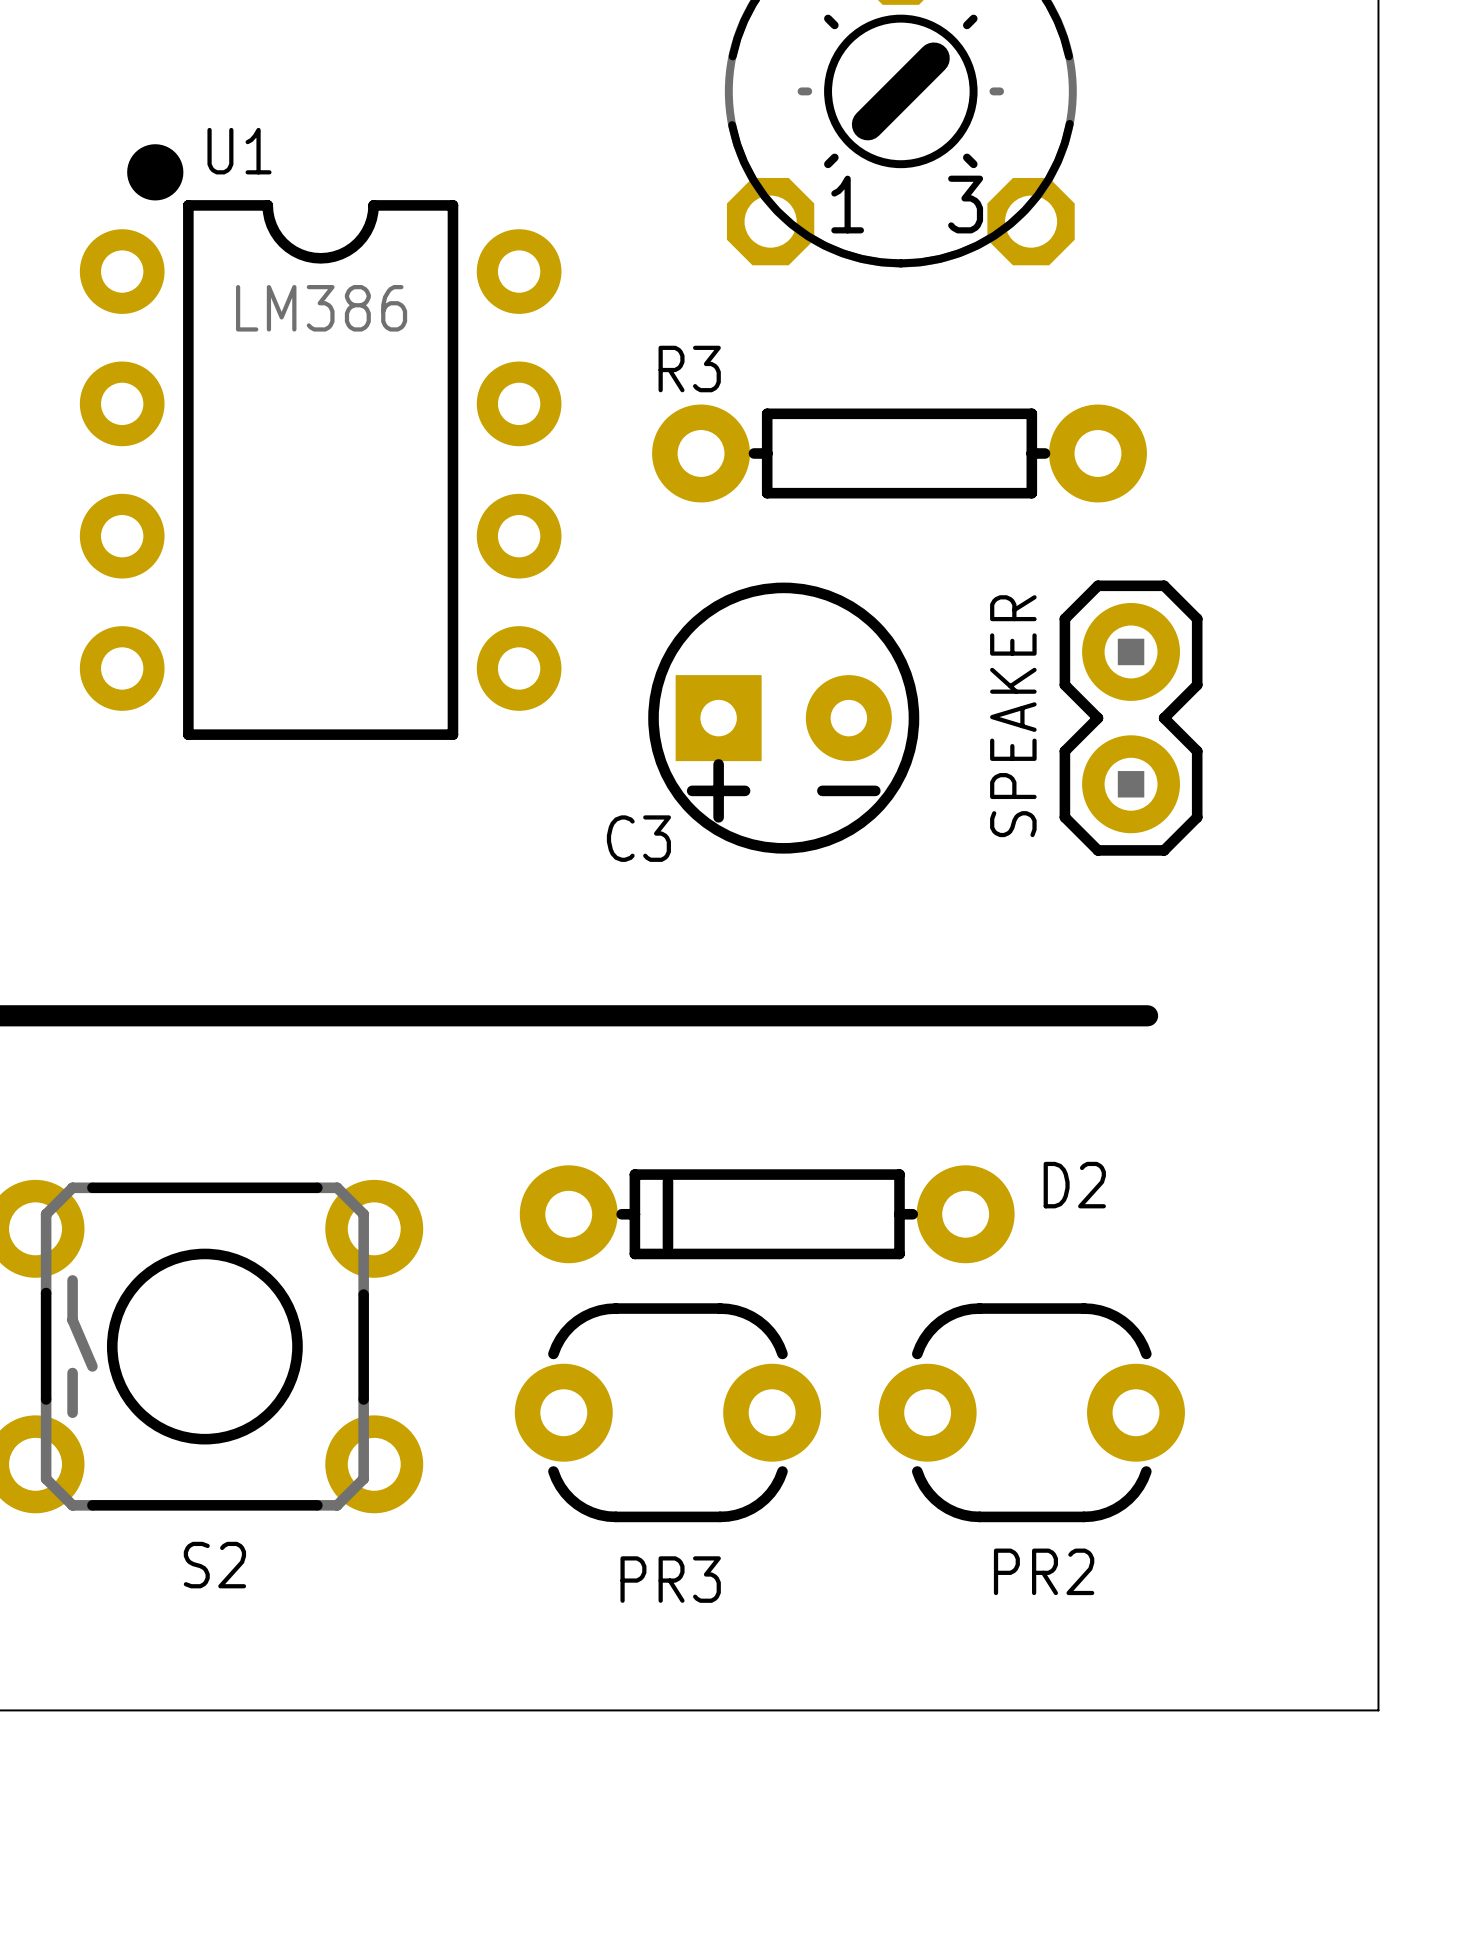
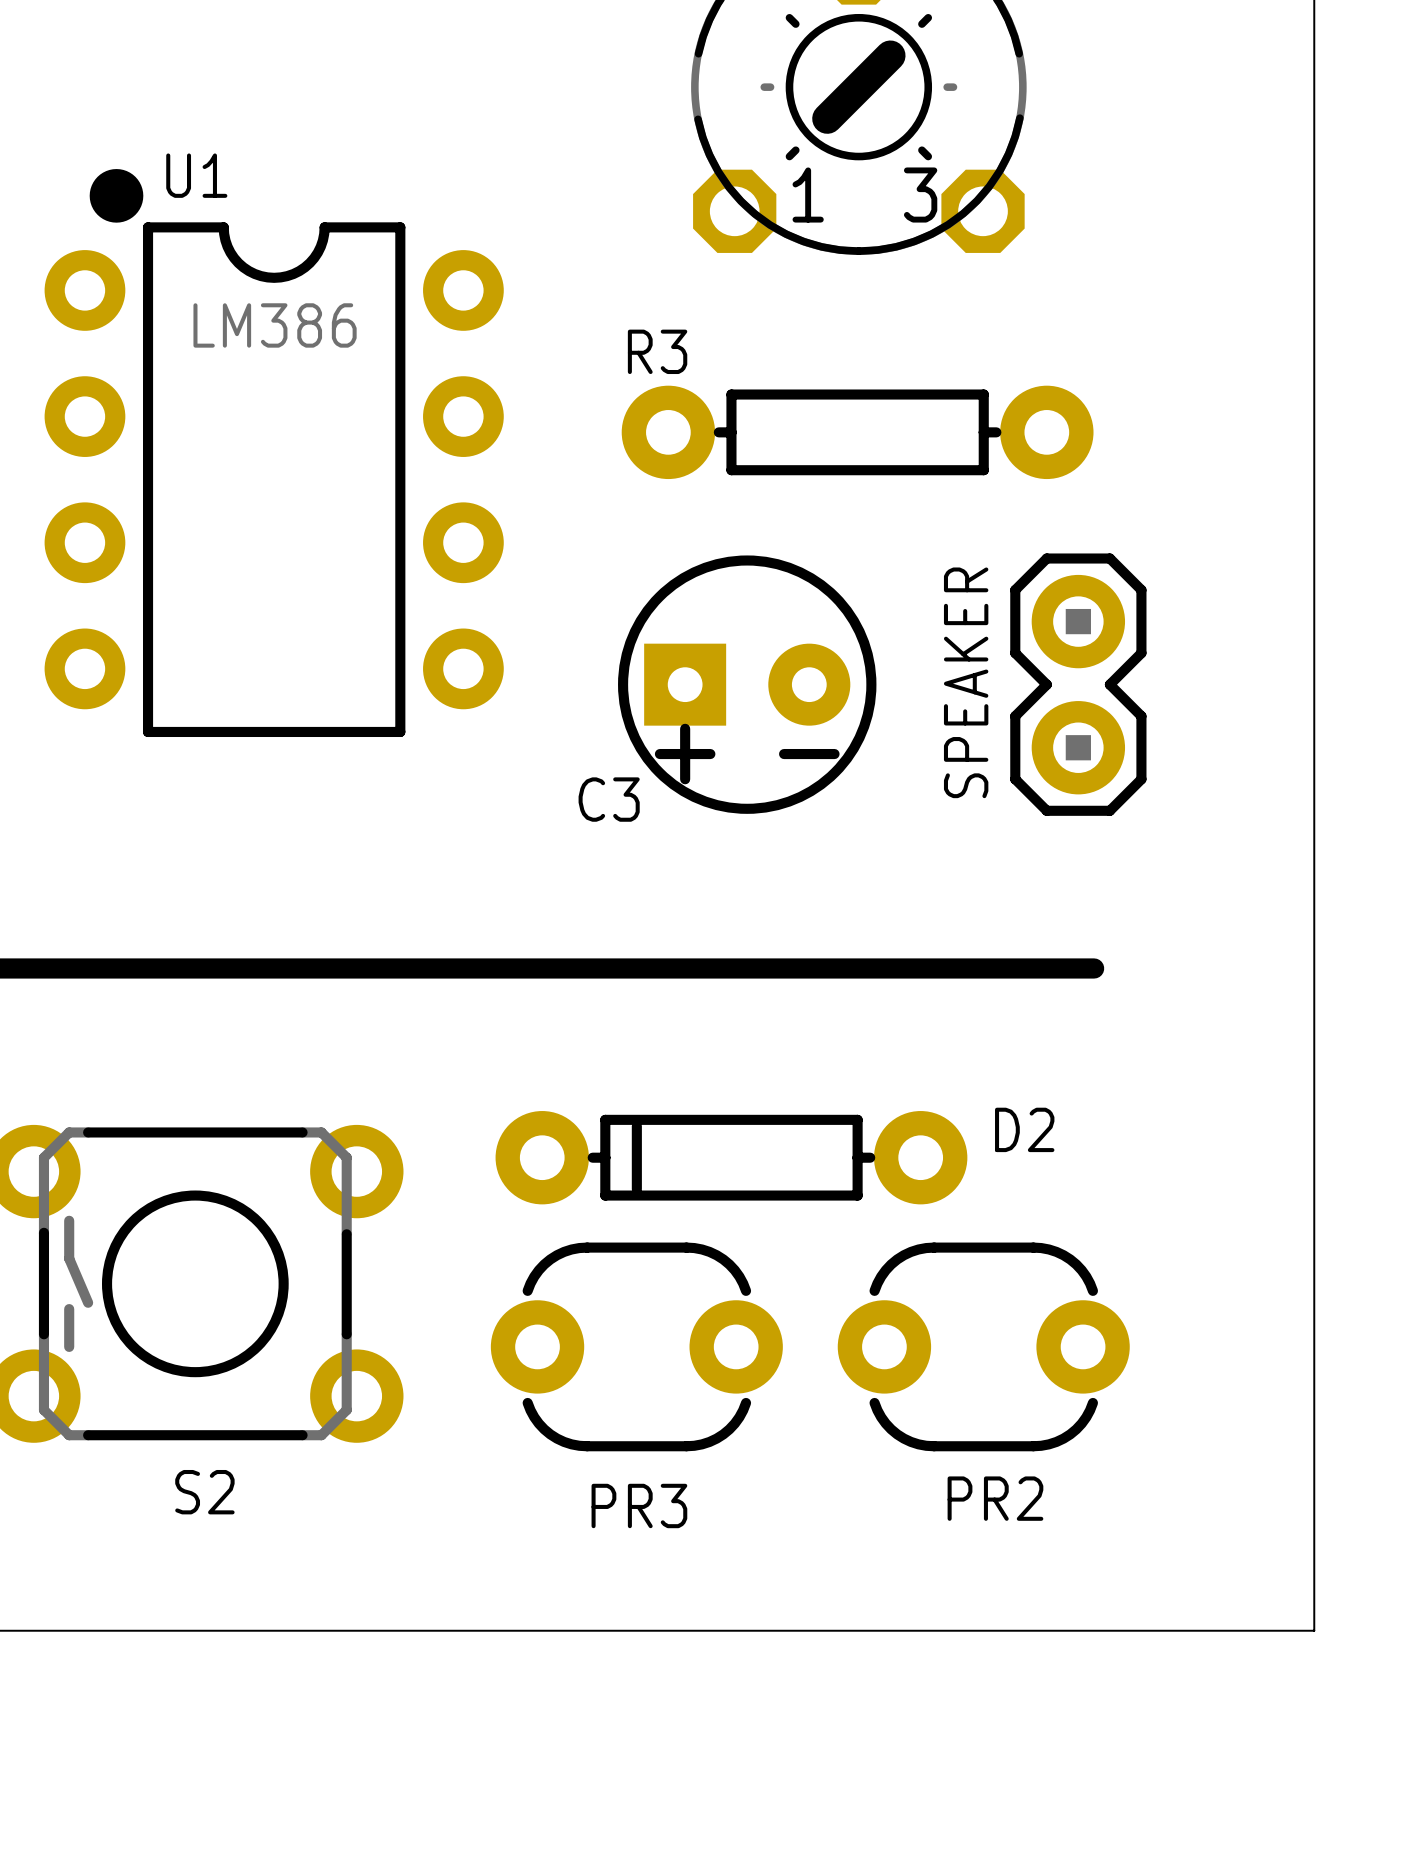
U1 position: (320, 442) -> (274, 453)

